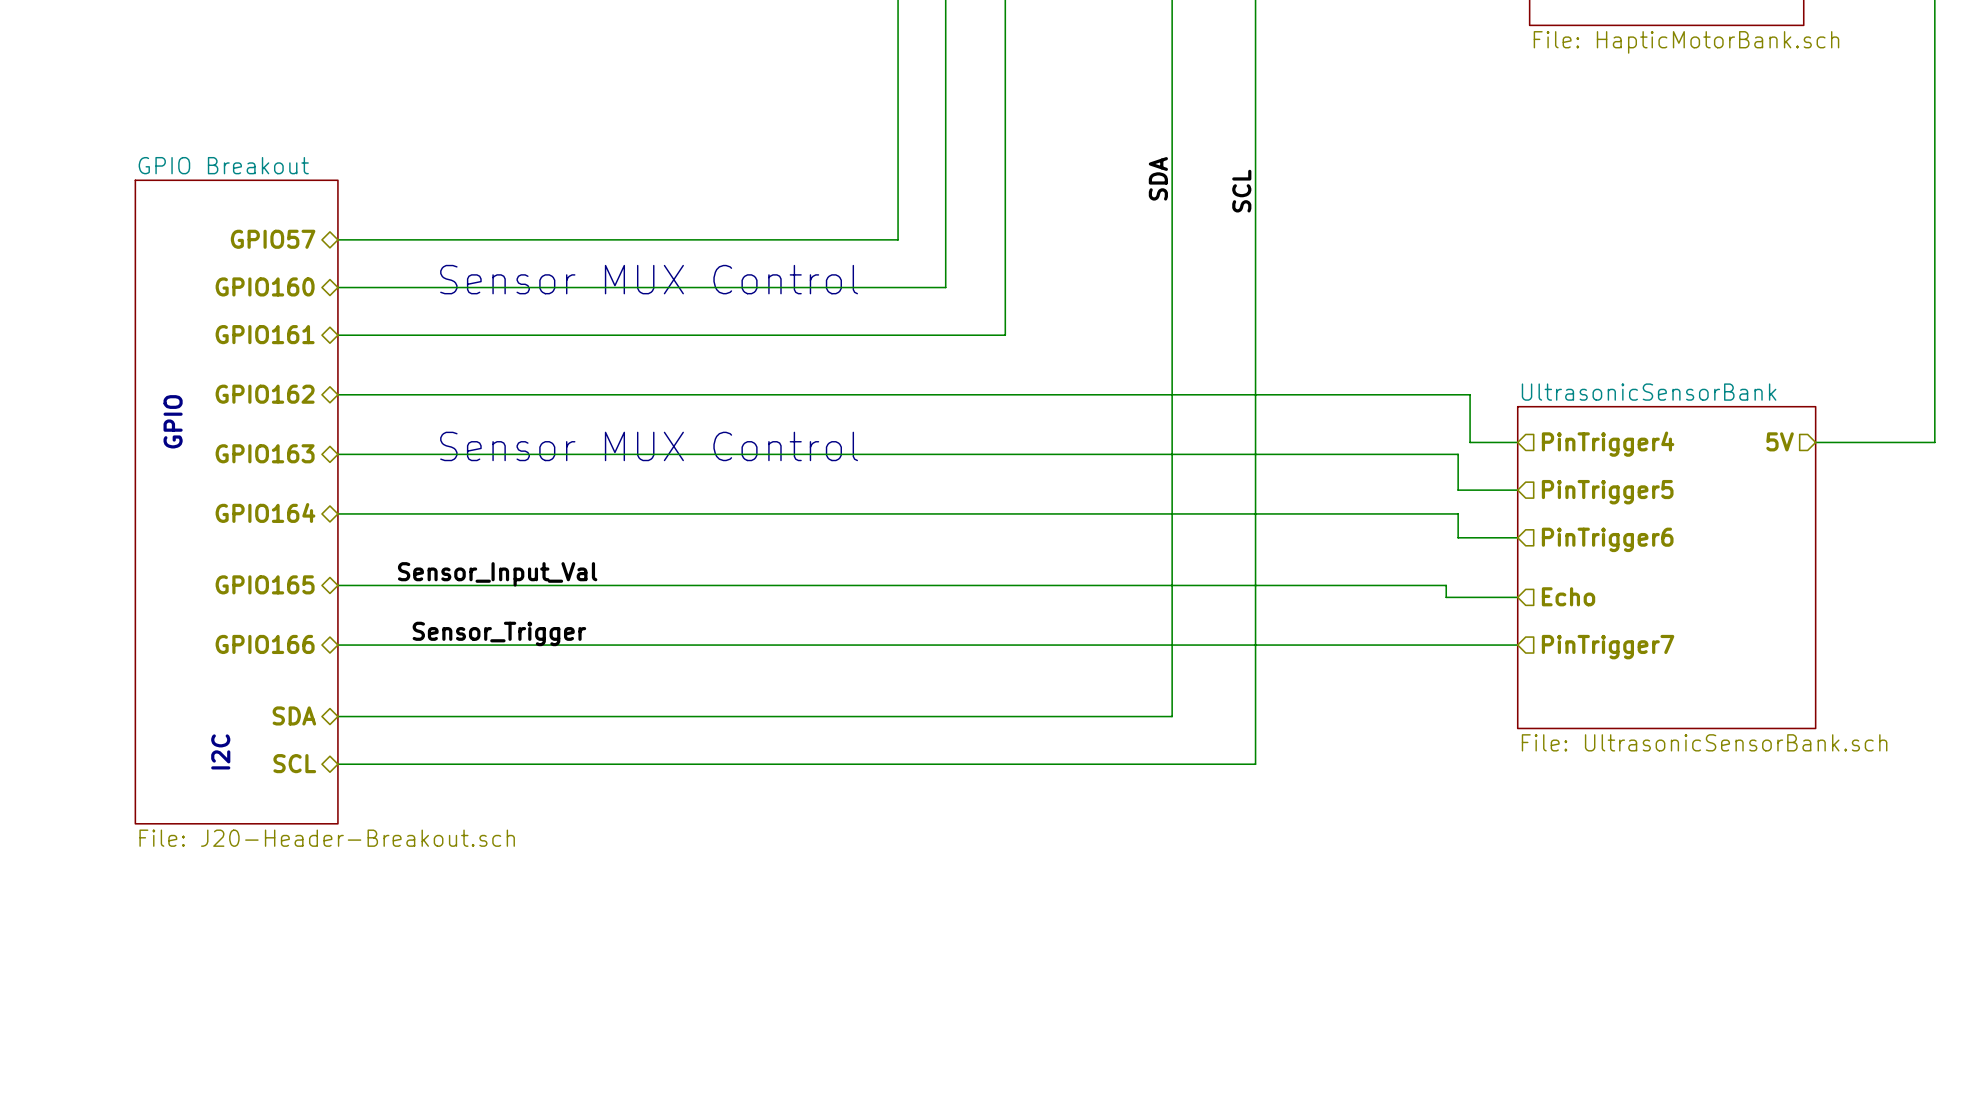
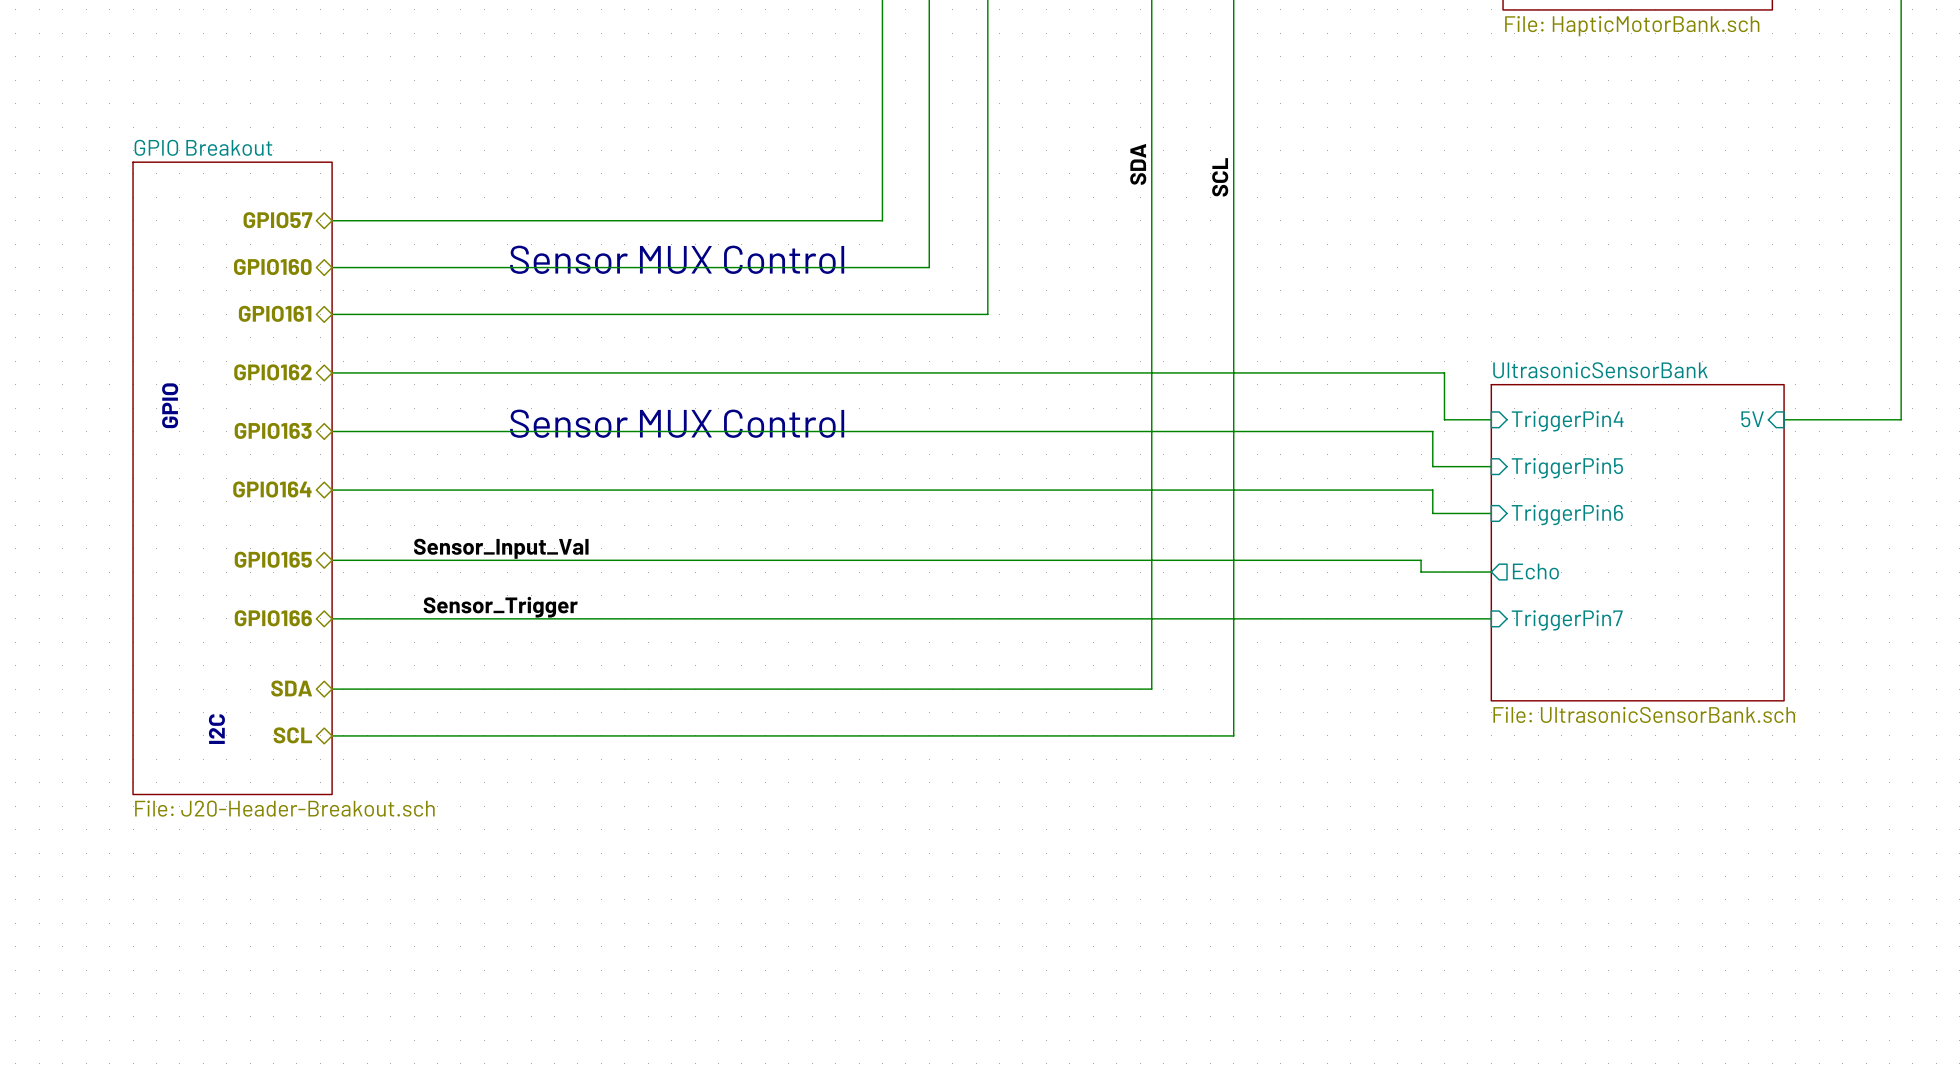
hierarchical label: 5V (1780, 441) -> none
sheet pin: none -> 5V (1752, 419)
sheet pin: none -> TriggerPin4 (1567, 421)
hierarchical label: PinTrigger4 (1608, 444) -> none
sheet pin: none -> TriggerPin5 (1567, 468)
hierarchical label: PinTrigger5 (1607, 492) -> none
sheet pin: none -> TriggerPin6 (1567, 515)
hierarchical label: PinTrigger6 (1607, 539) -> none
sheet pin: none -> Echo (1535, 571)
hierarchical label: Echo (1568, 596) -> none
sheet pin: none -> TriggerPin7 (1567, 620)
hierarchical label: PinTrigger7 (1608, 647) -> none

